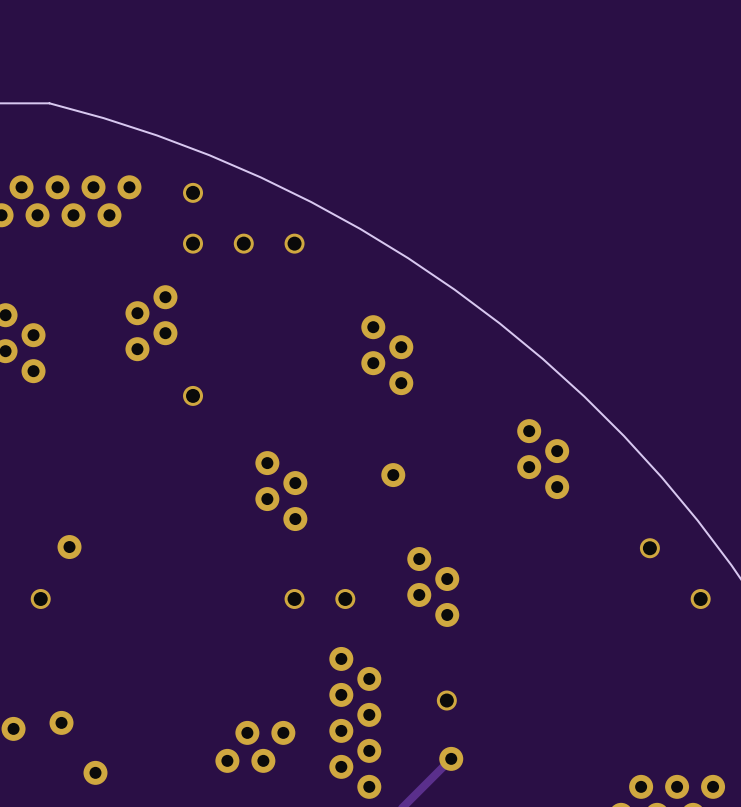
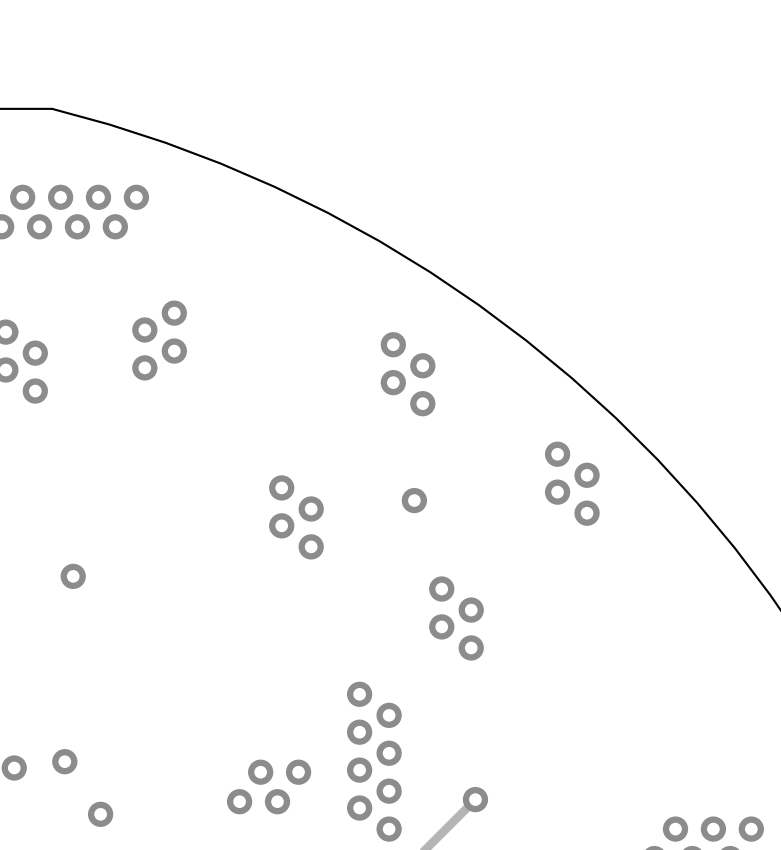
via: (193, 192) -> none
via: (193, 243) -> none
via: (243, 243) -> none
via: (294, 243) -> none
via: (193, 395) -> none
via: (649, 548) -> none
via: (40, 598) -> none
via: (294, 598) -> none
via: (345, 598) -> none
via: (700, 598) -> none
via: (446, 700) -> none

